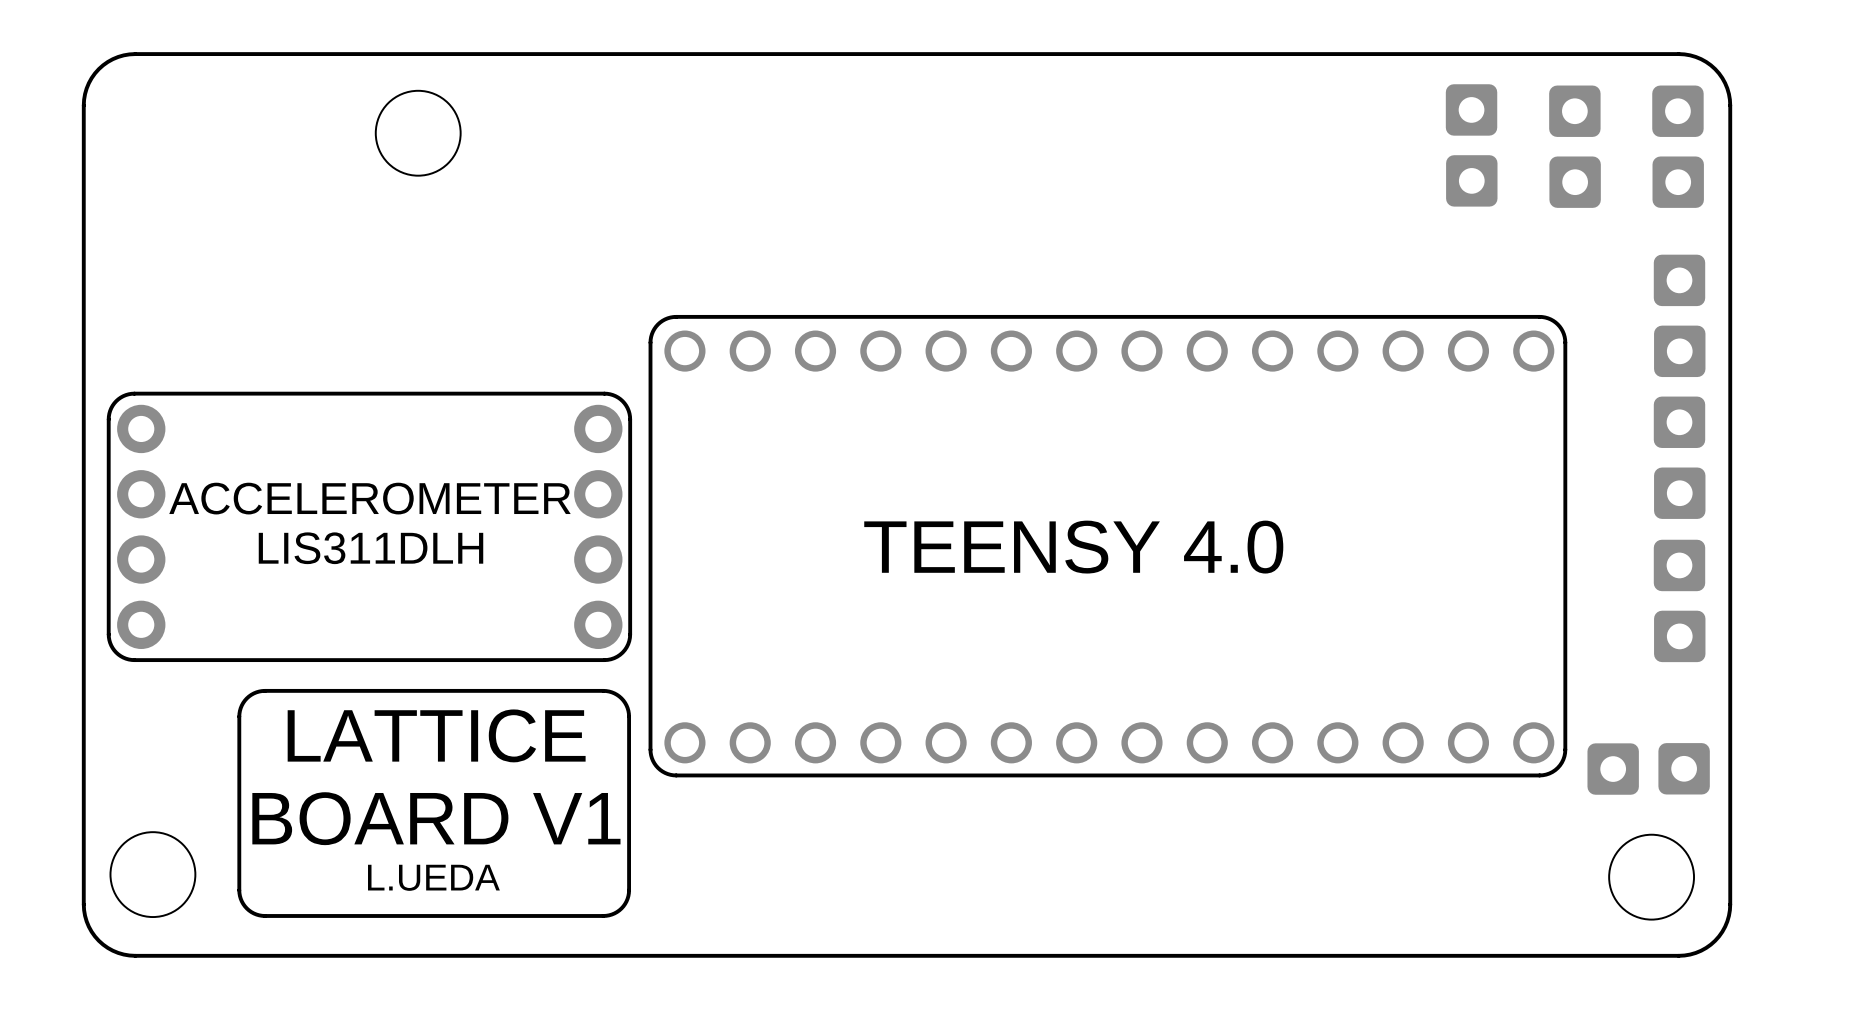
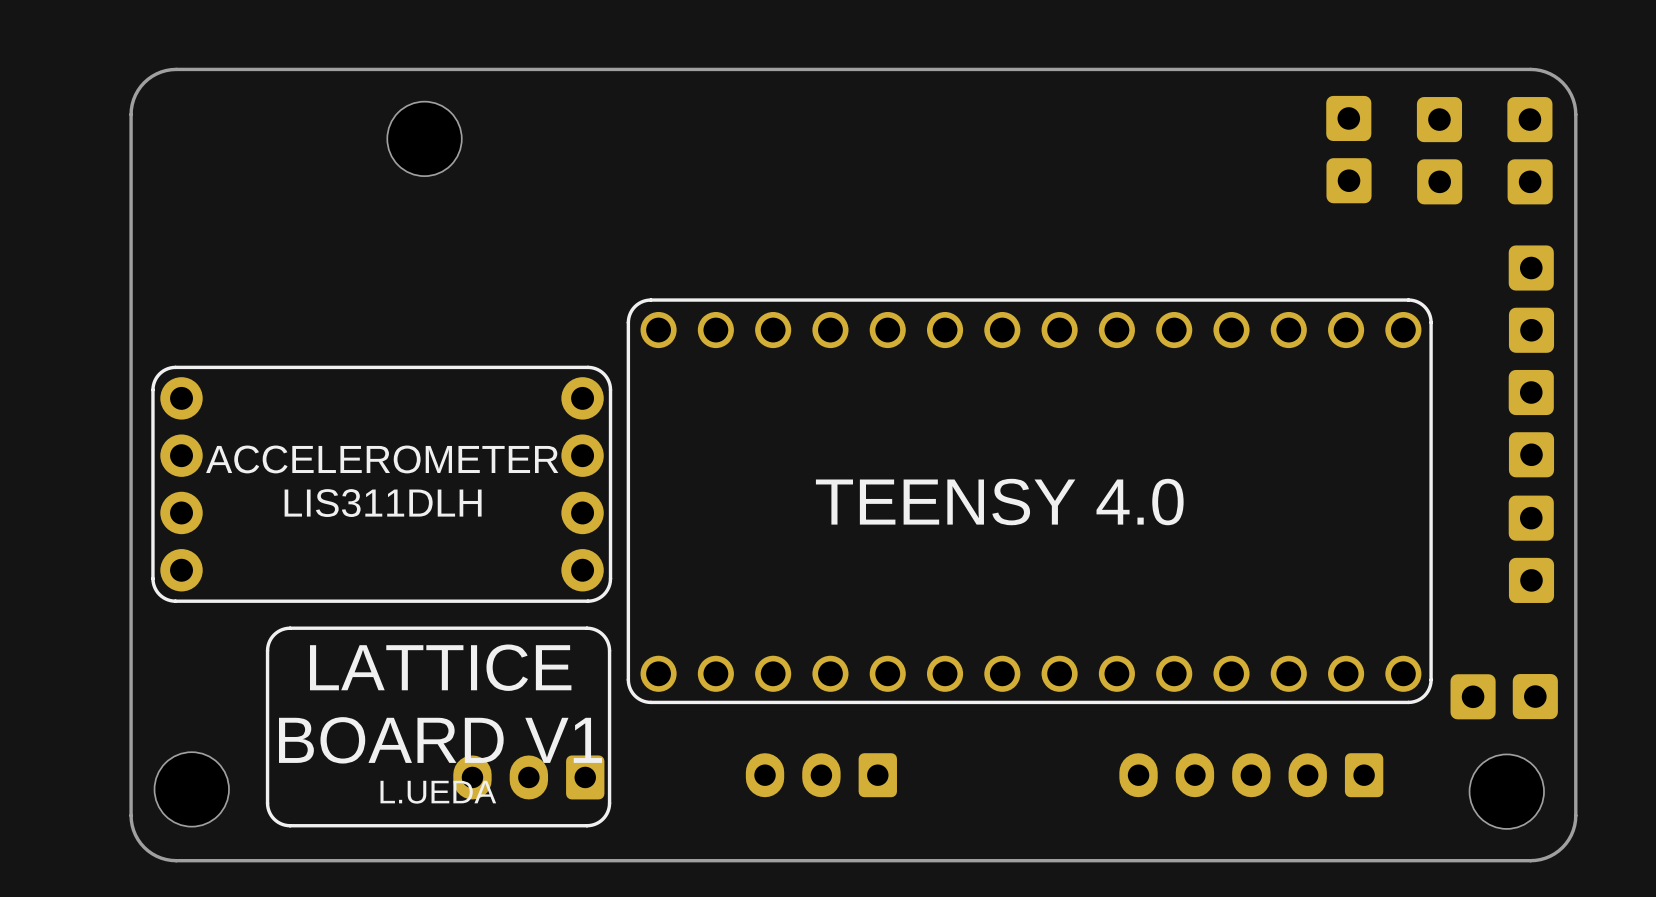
part: none -> (821, 775)
part: none -> (1251, 775)
part: none -> (528, 777)

